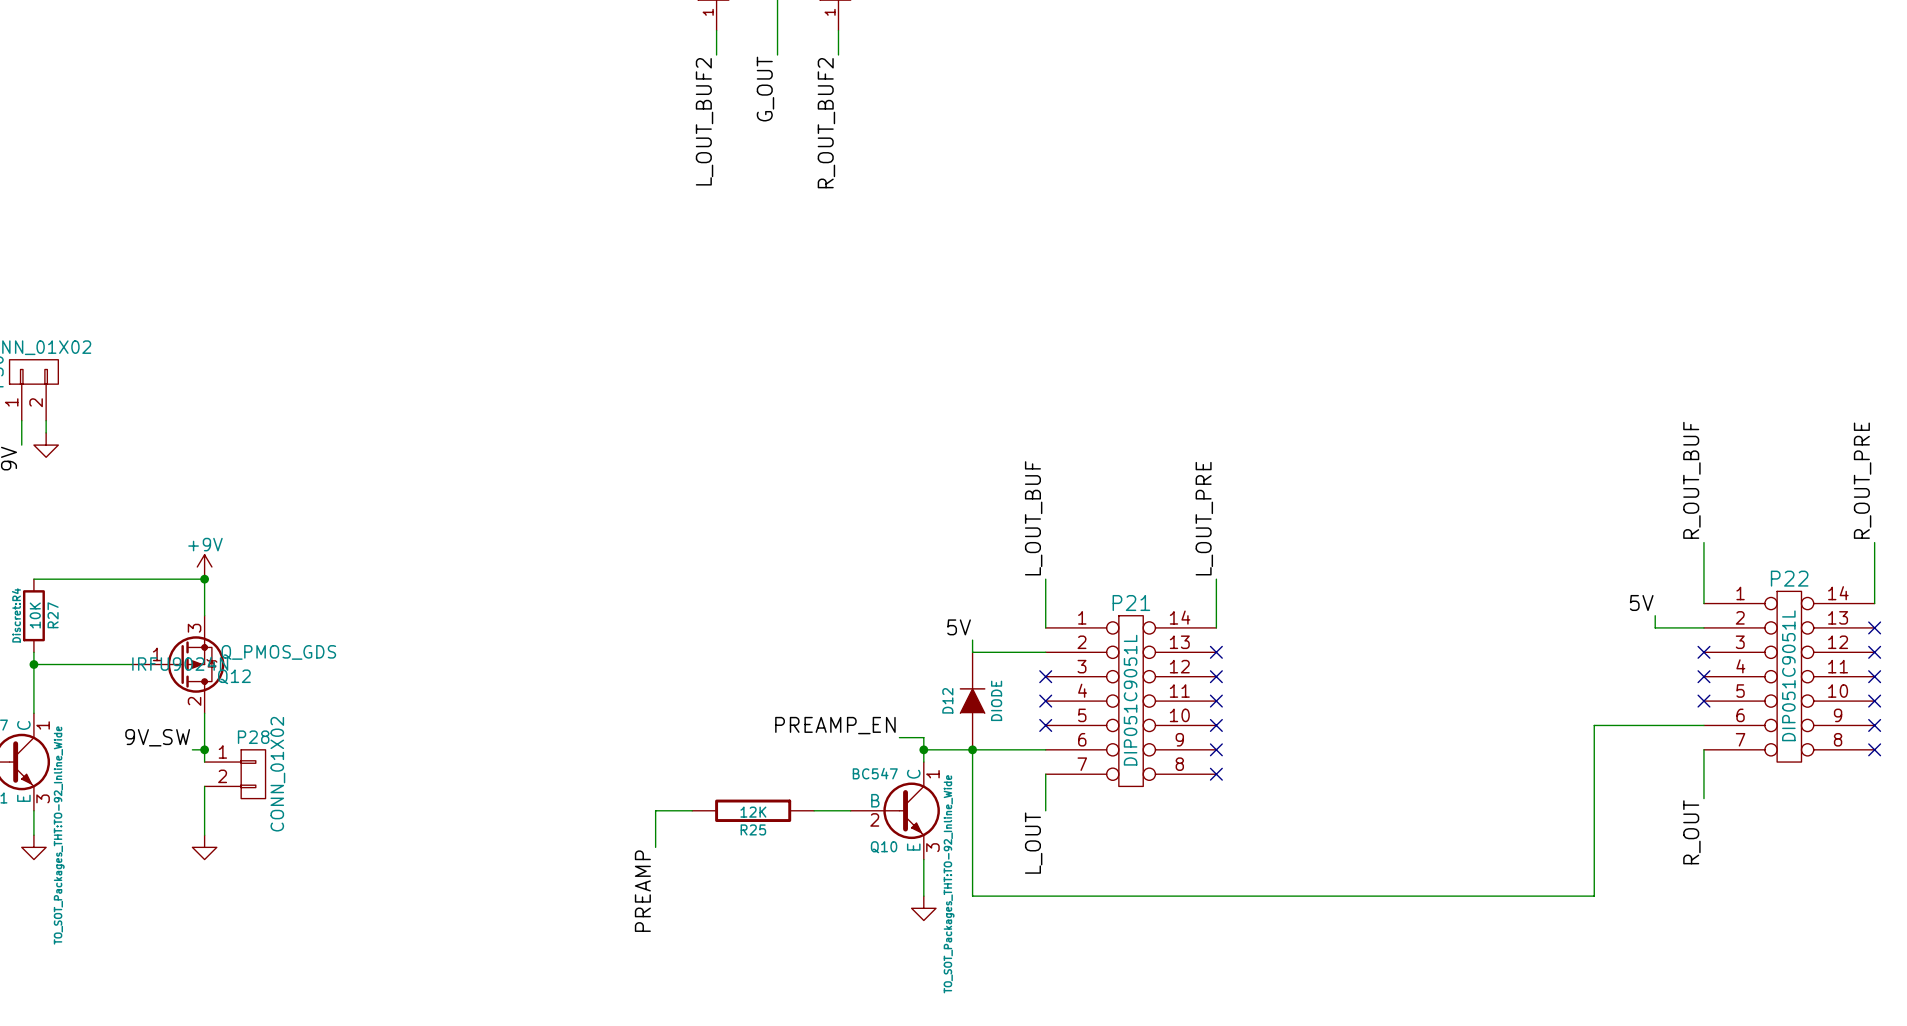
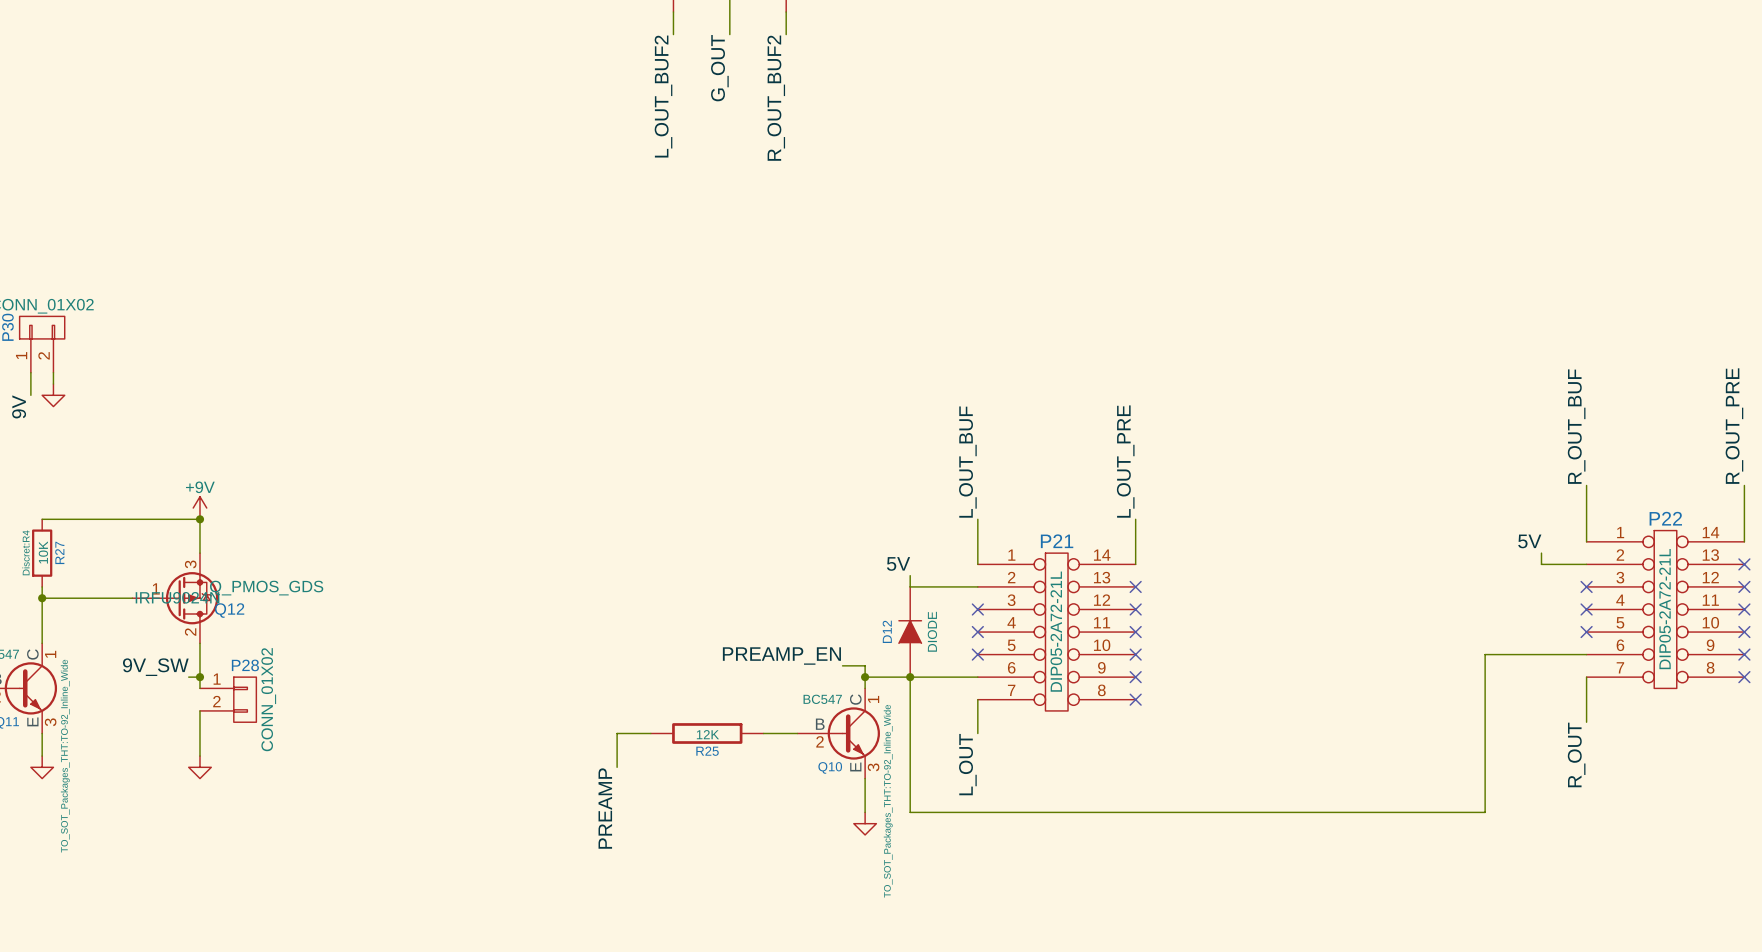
P22 value: DIP051C9051L (1788, 675) -> DIP05-2A72-21L (1665, 609)
P21 value: DIP051C9051L (1130, 700) -> DIP05-2A72-21L (1056, 631)

